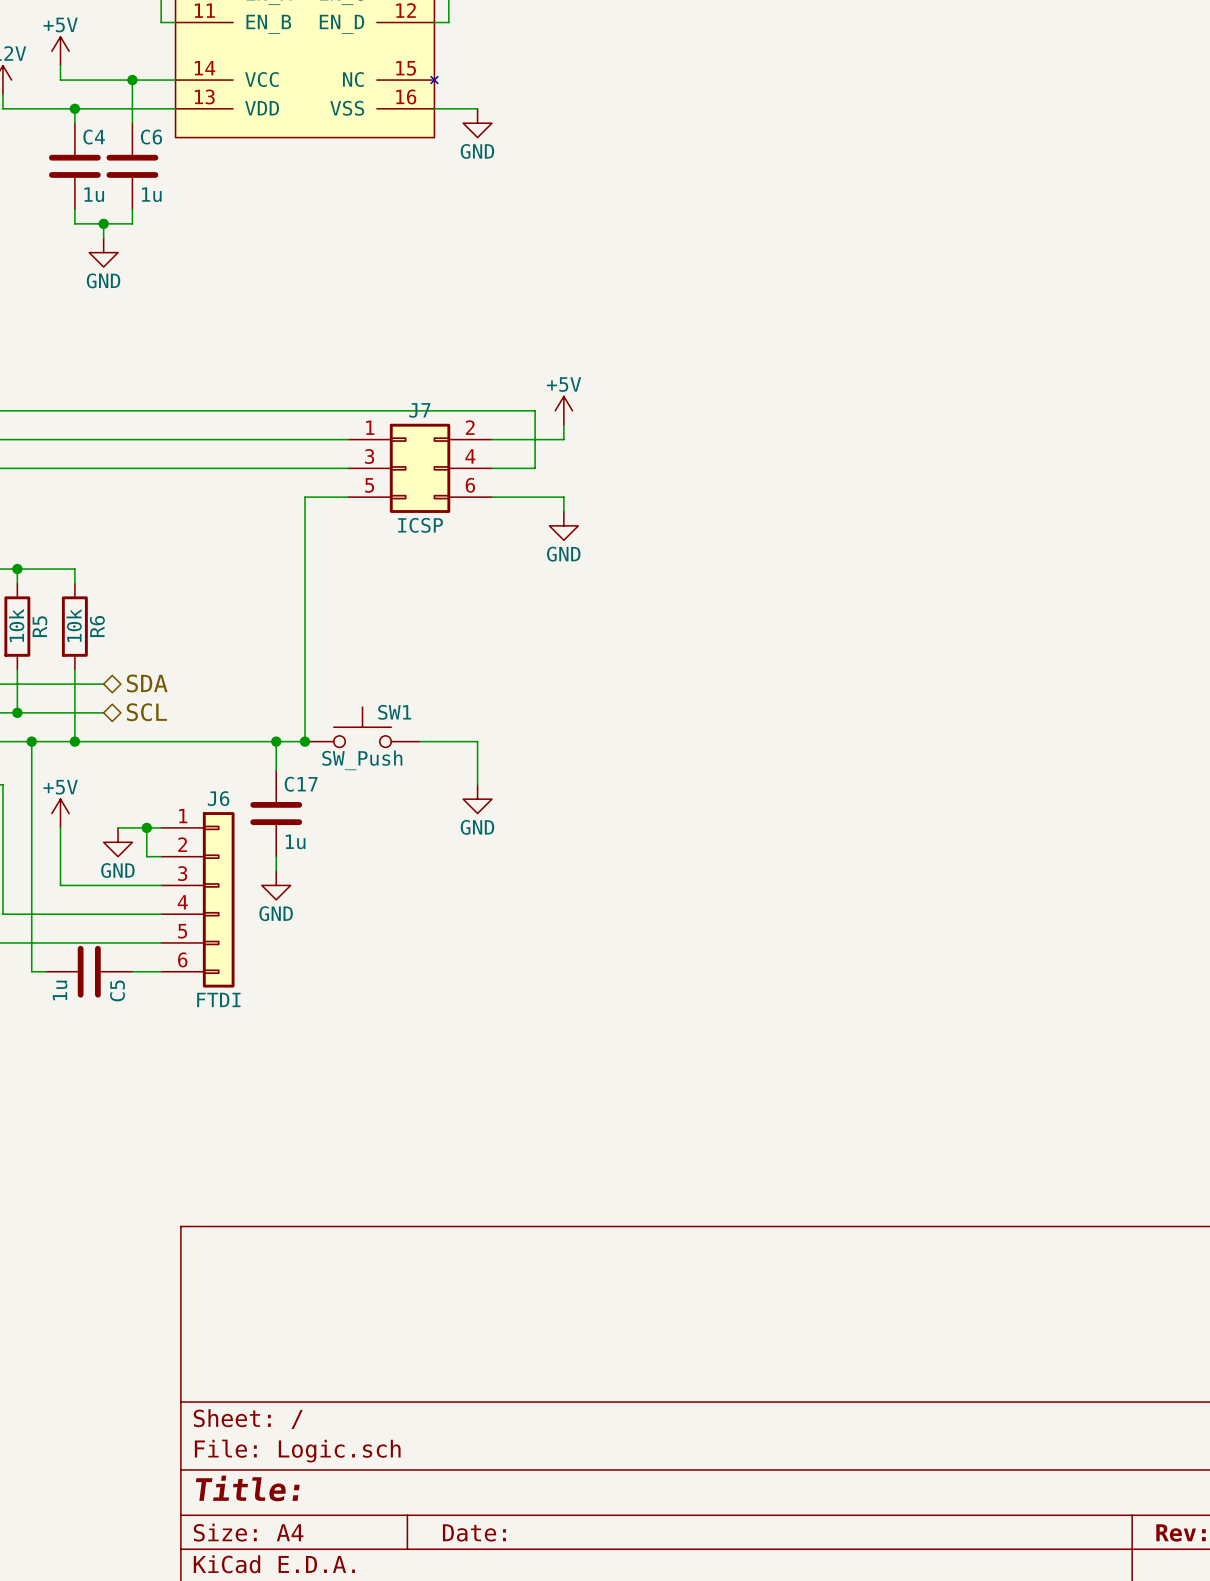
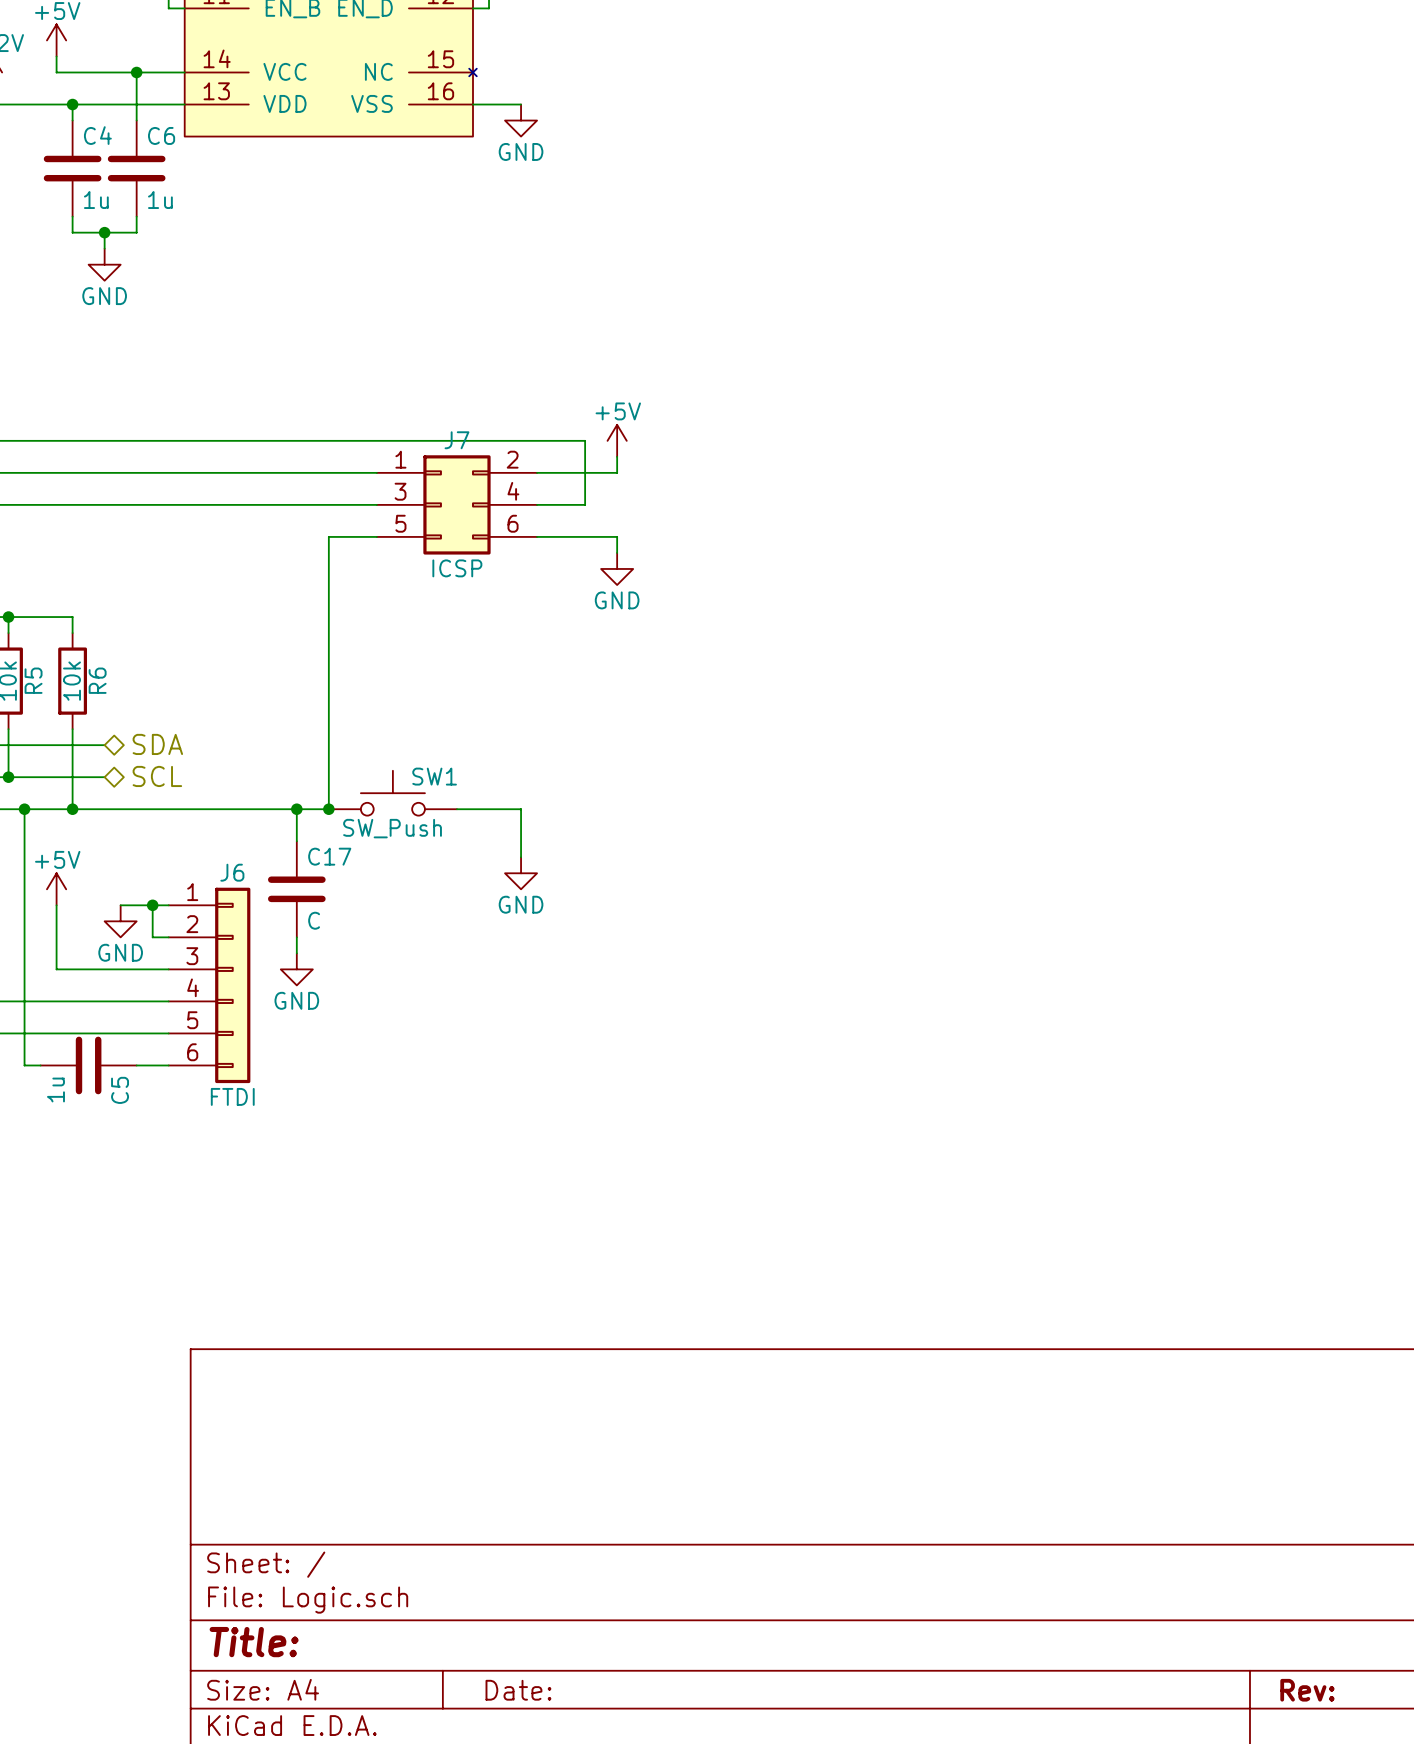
C17 value: 1u (295, 841) -> C (314, 920)

